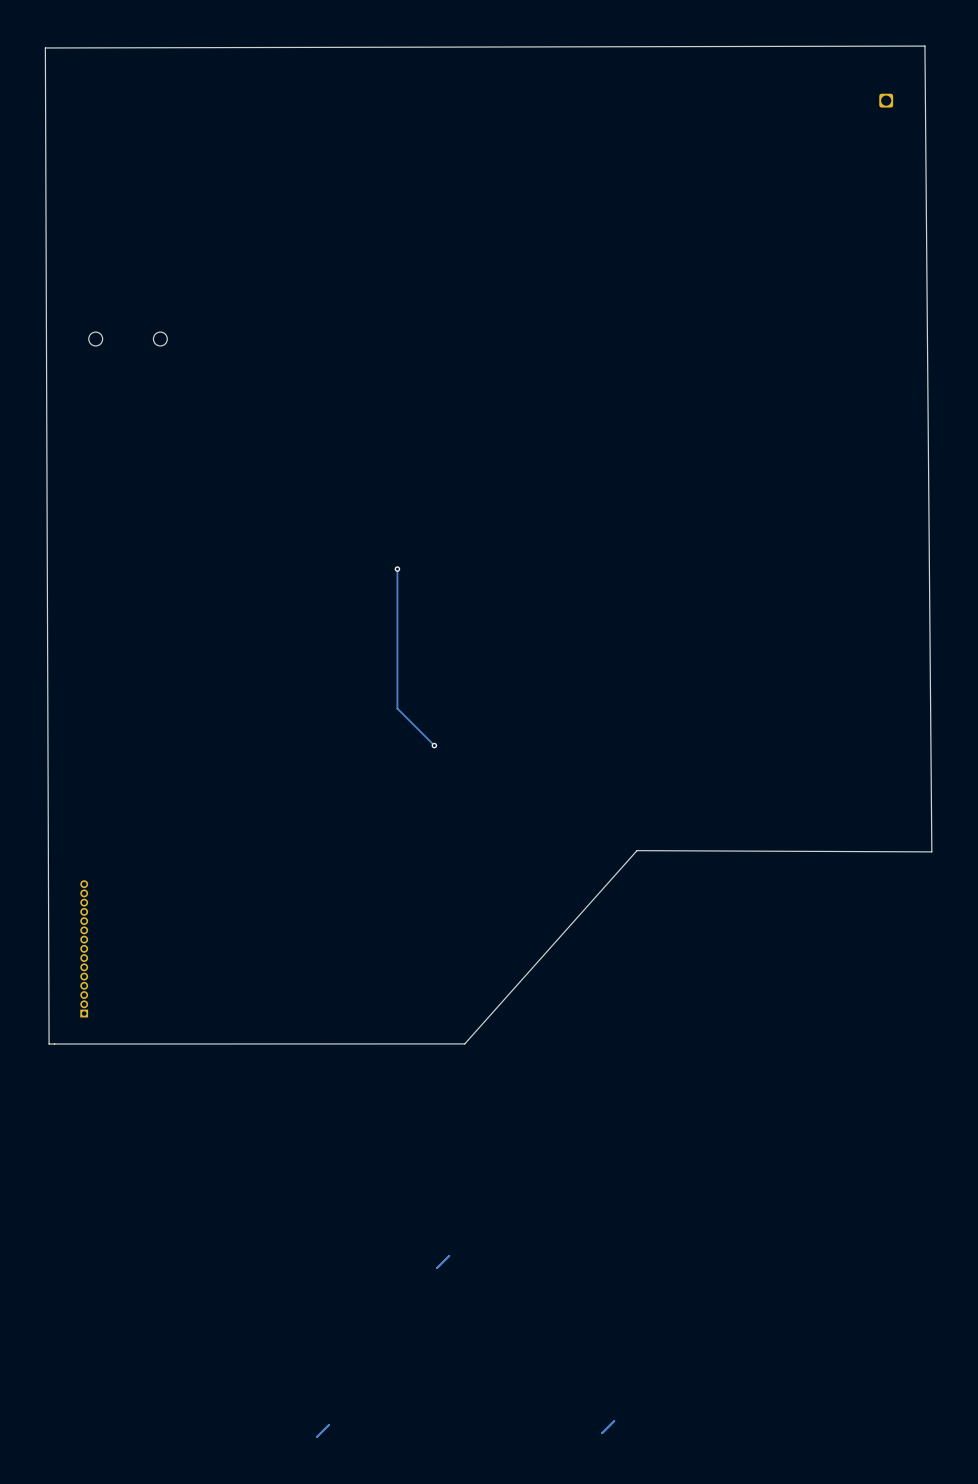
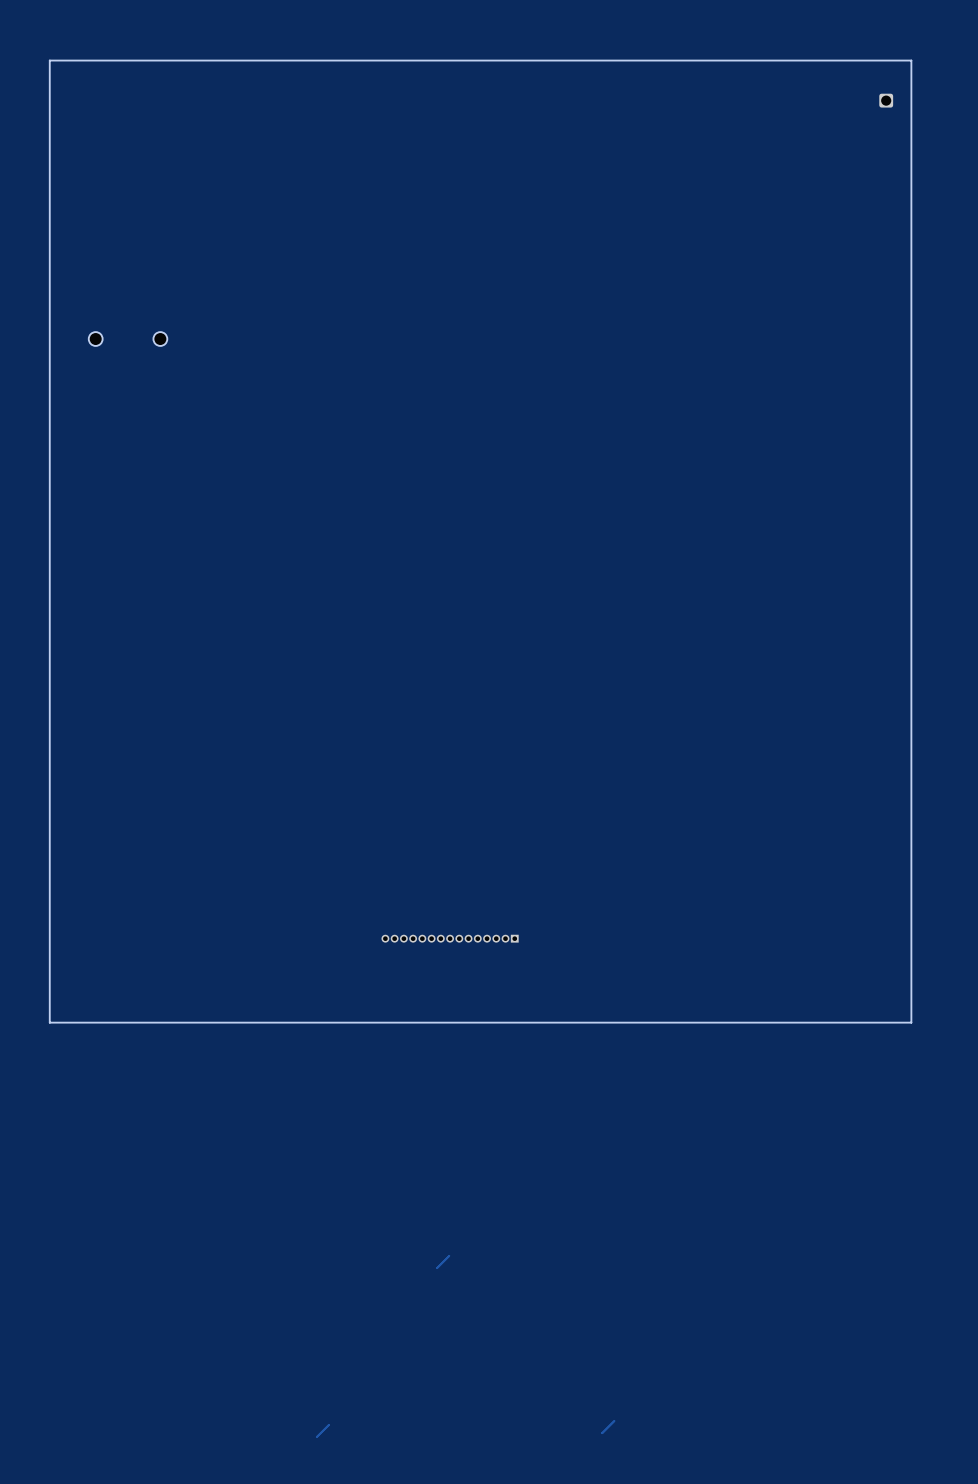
board edge: (924, 46) (931, 851) (636, 850) (464, 1043) (49, 1044) (45, 47) (924, 46) -> (911, 60) (911, 1022) (49, 1022) (49, 60) (911, 60)
track: (397, 569) (397, 708) (434, 745) -> none
via: (397, 569) -> none
via: (434, 745) -> none
part: none -> (450, 938)
part: (84, 948) -> none

